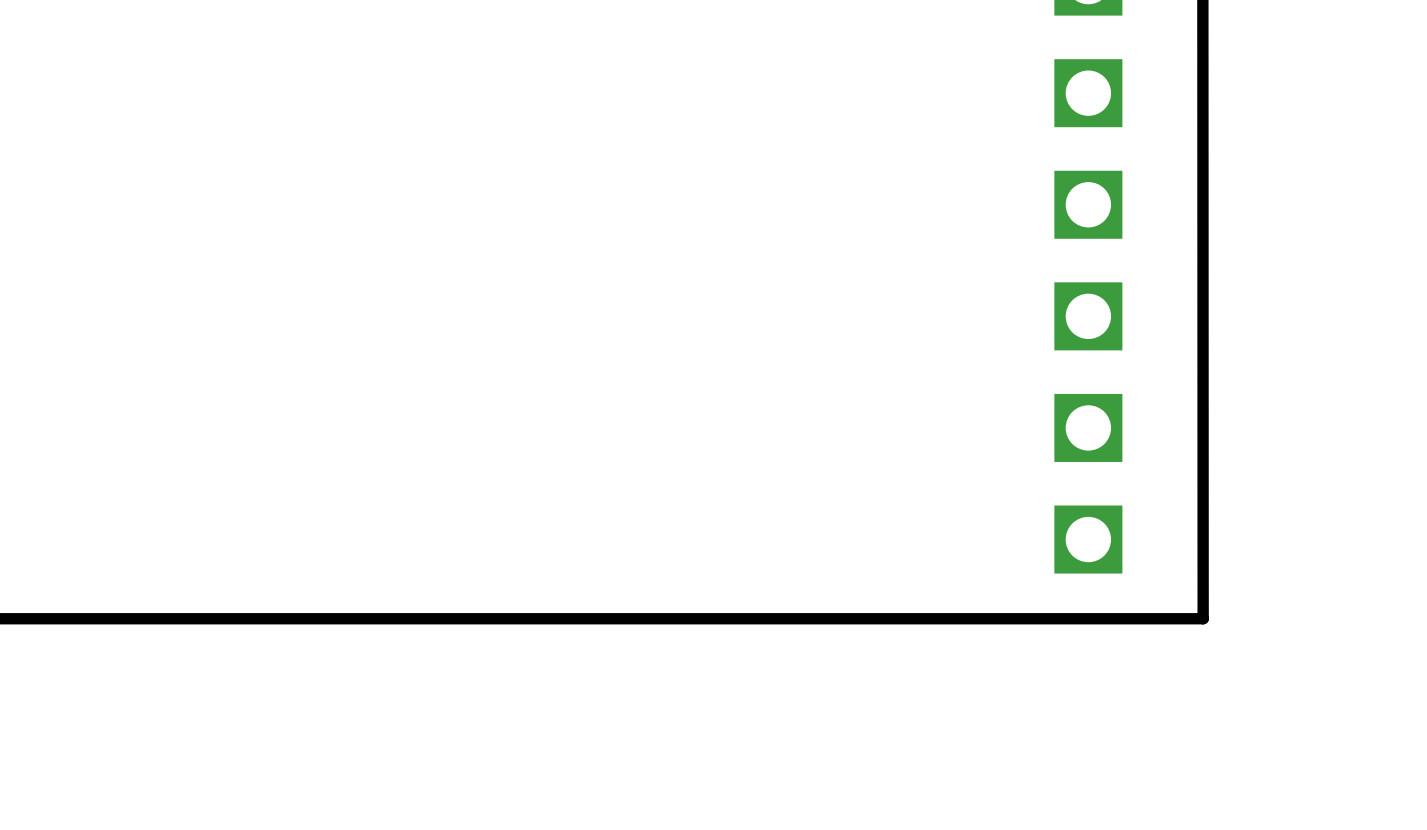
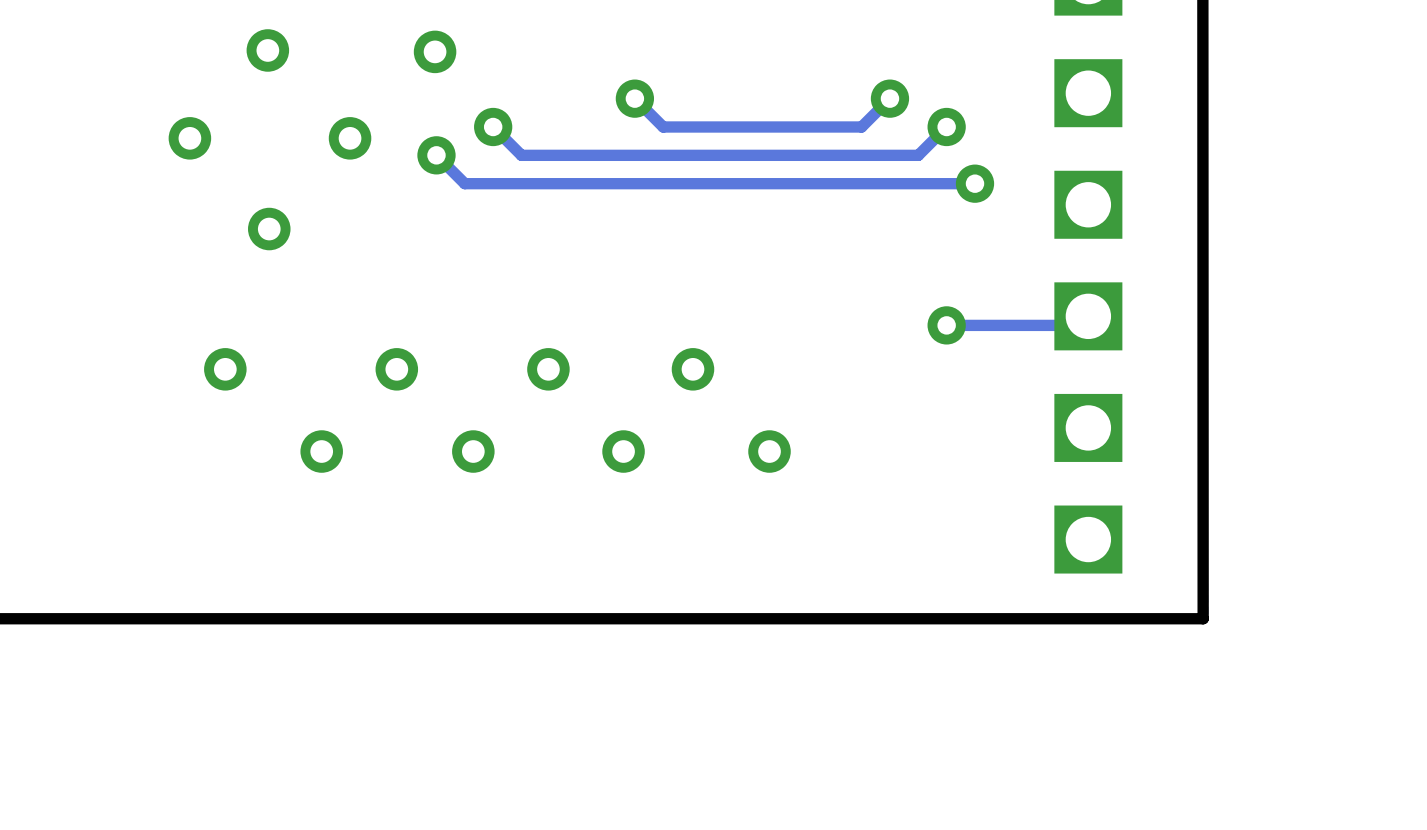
via: none -> (267, 50)
via: none -> (435, 51)
via: none -> (634, 98)
track: none -> (889, 98) (861, 126) (663, 126) (634, 98)
via: none -> (889, 98)
via: none -> (493, 126)
track: none -> (946, 126) (918, 155) (521, 155) (493, 126)
via: none -> (946, 126)
via: none -> (189, 138)
via: none -> (350, 138)
track: none -> (436, 155) (464, 183) (975, 183)
via: none -> (436, 155)
via: none -> (975, 183)
via: none -> (269, 229)
track: none -> (1088, 316) (1088, 325) (946, 325)
via: none -> (946, 325)
via: none -> (225, 369)
via: none -> (396, 369)
via: none -> (548, 369)
via: none -> (692, 369)
via: none -> (321, 451)
via: none -> (473, 451)
via: none -> (623, 451)
via: none -> (769, 451)

